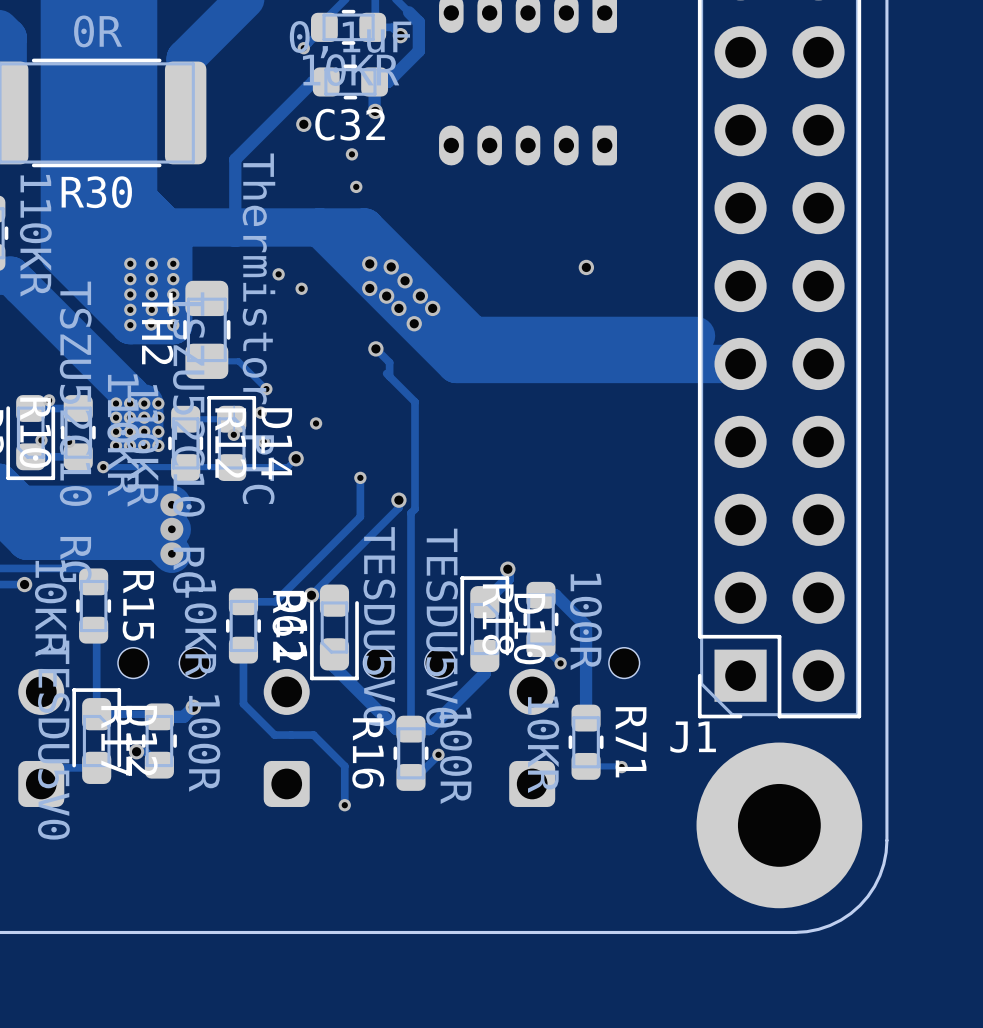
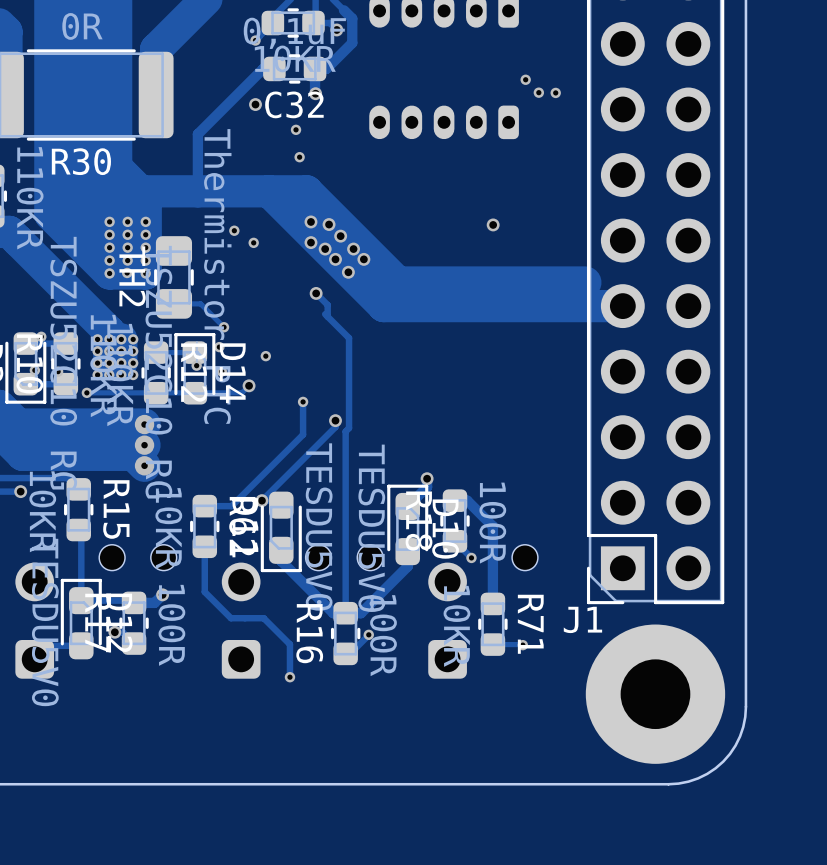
via: none -> (525, 79)
via: none -> (538, 92)
via: none -> (555, 92)

